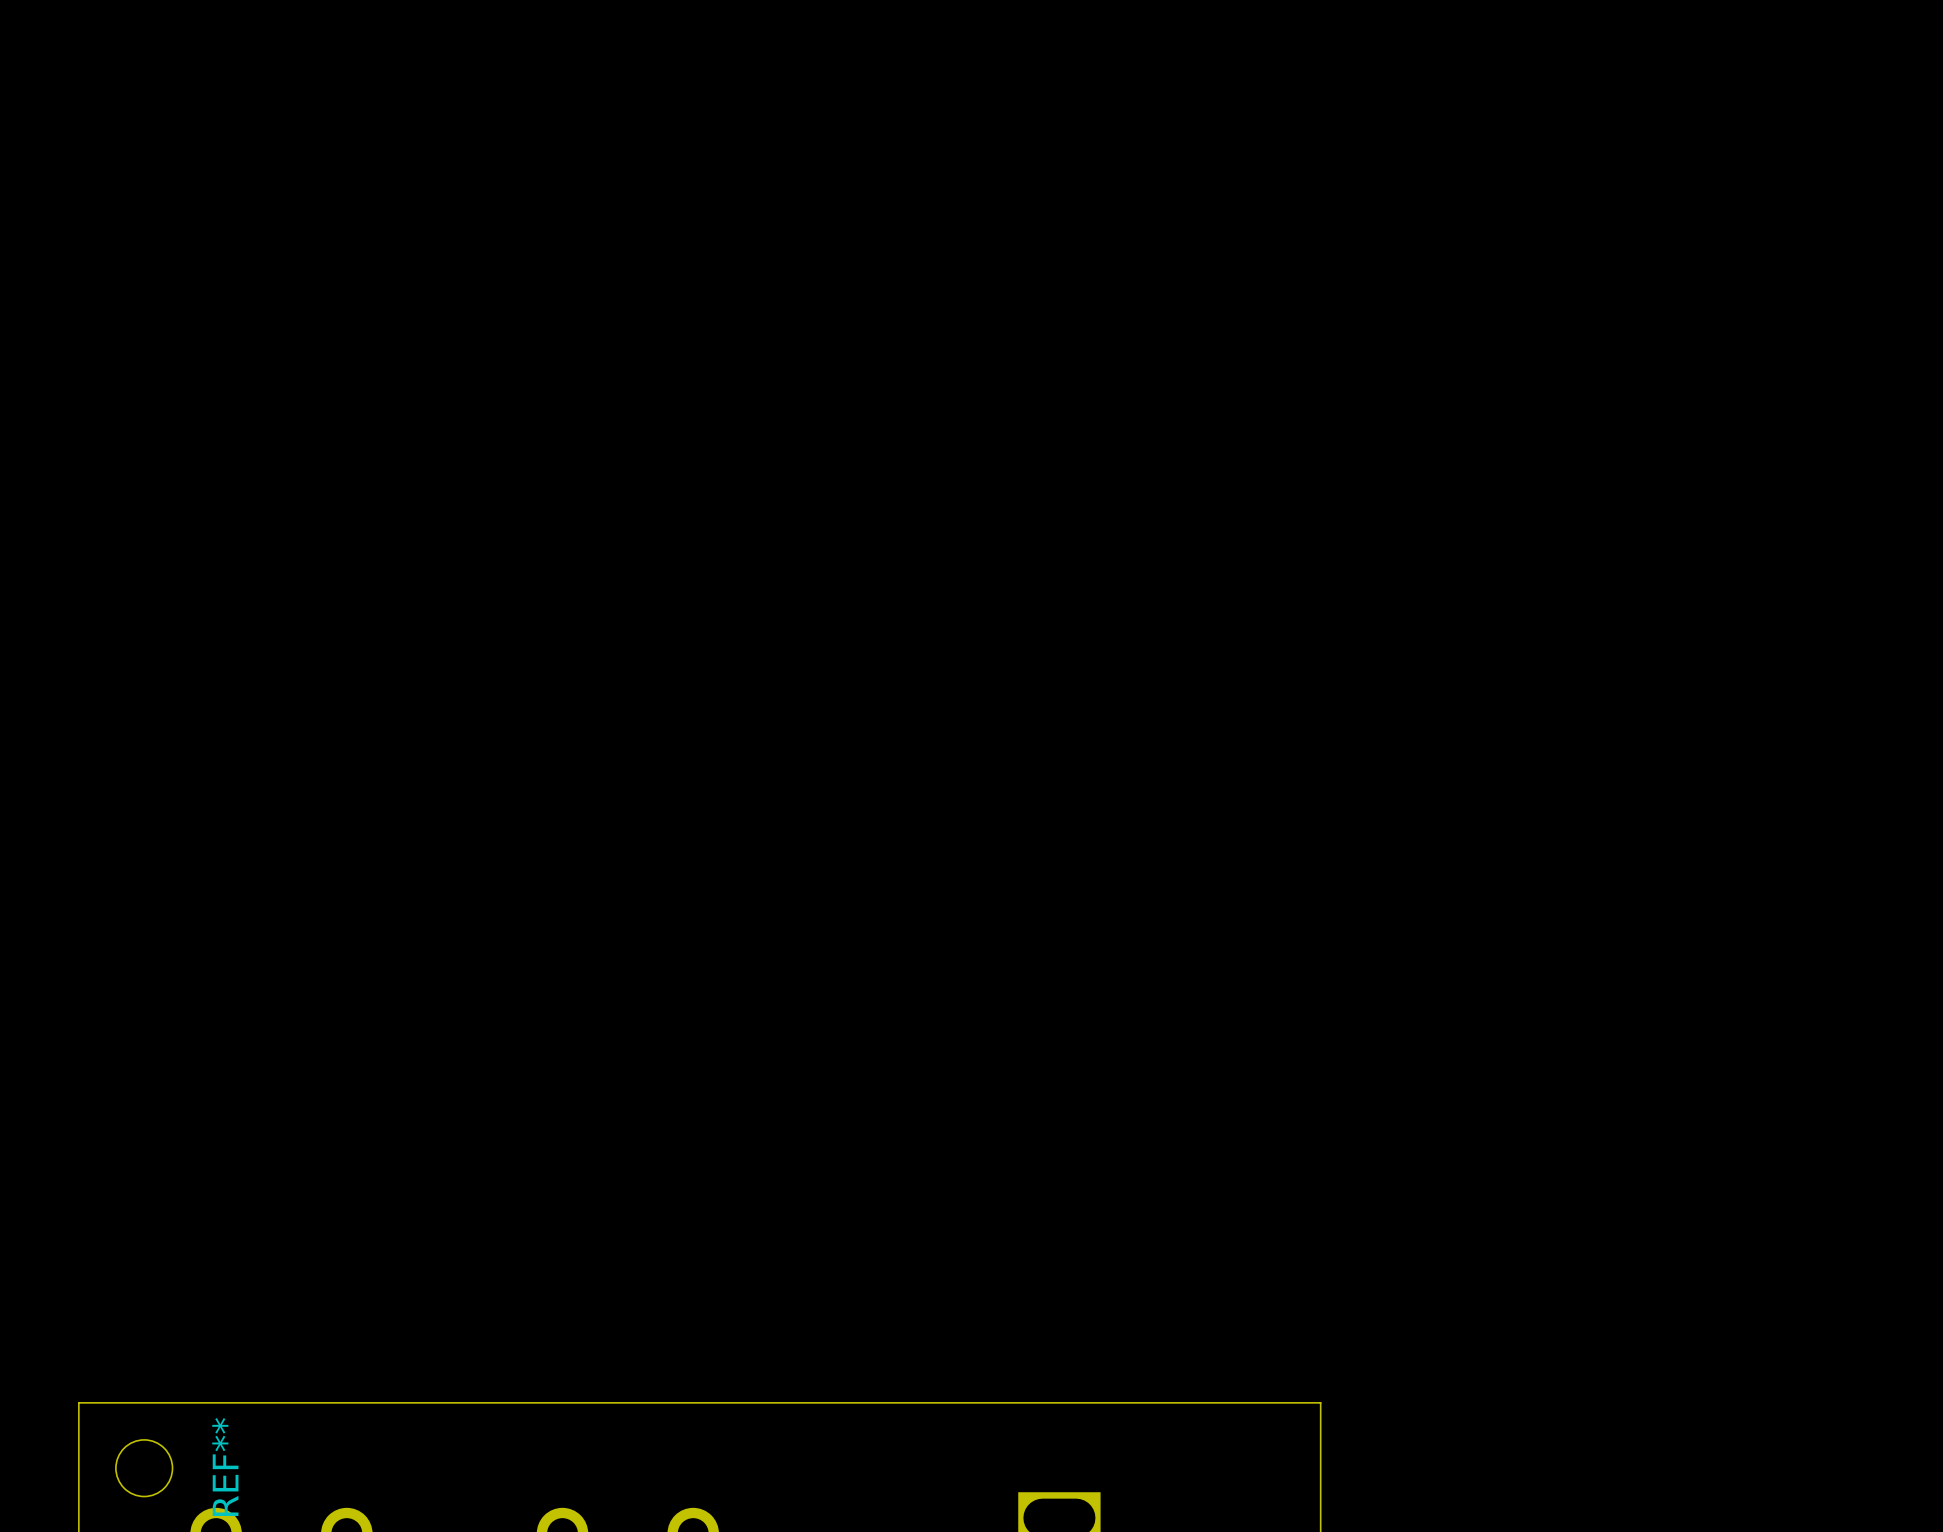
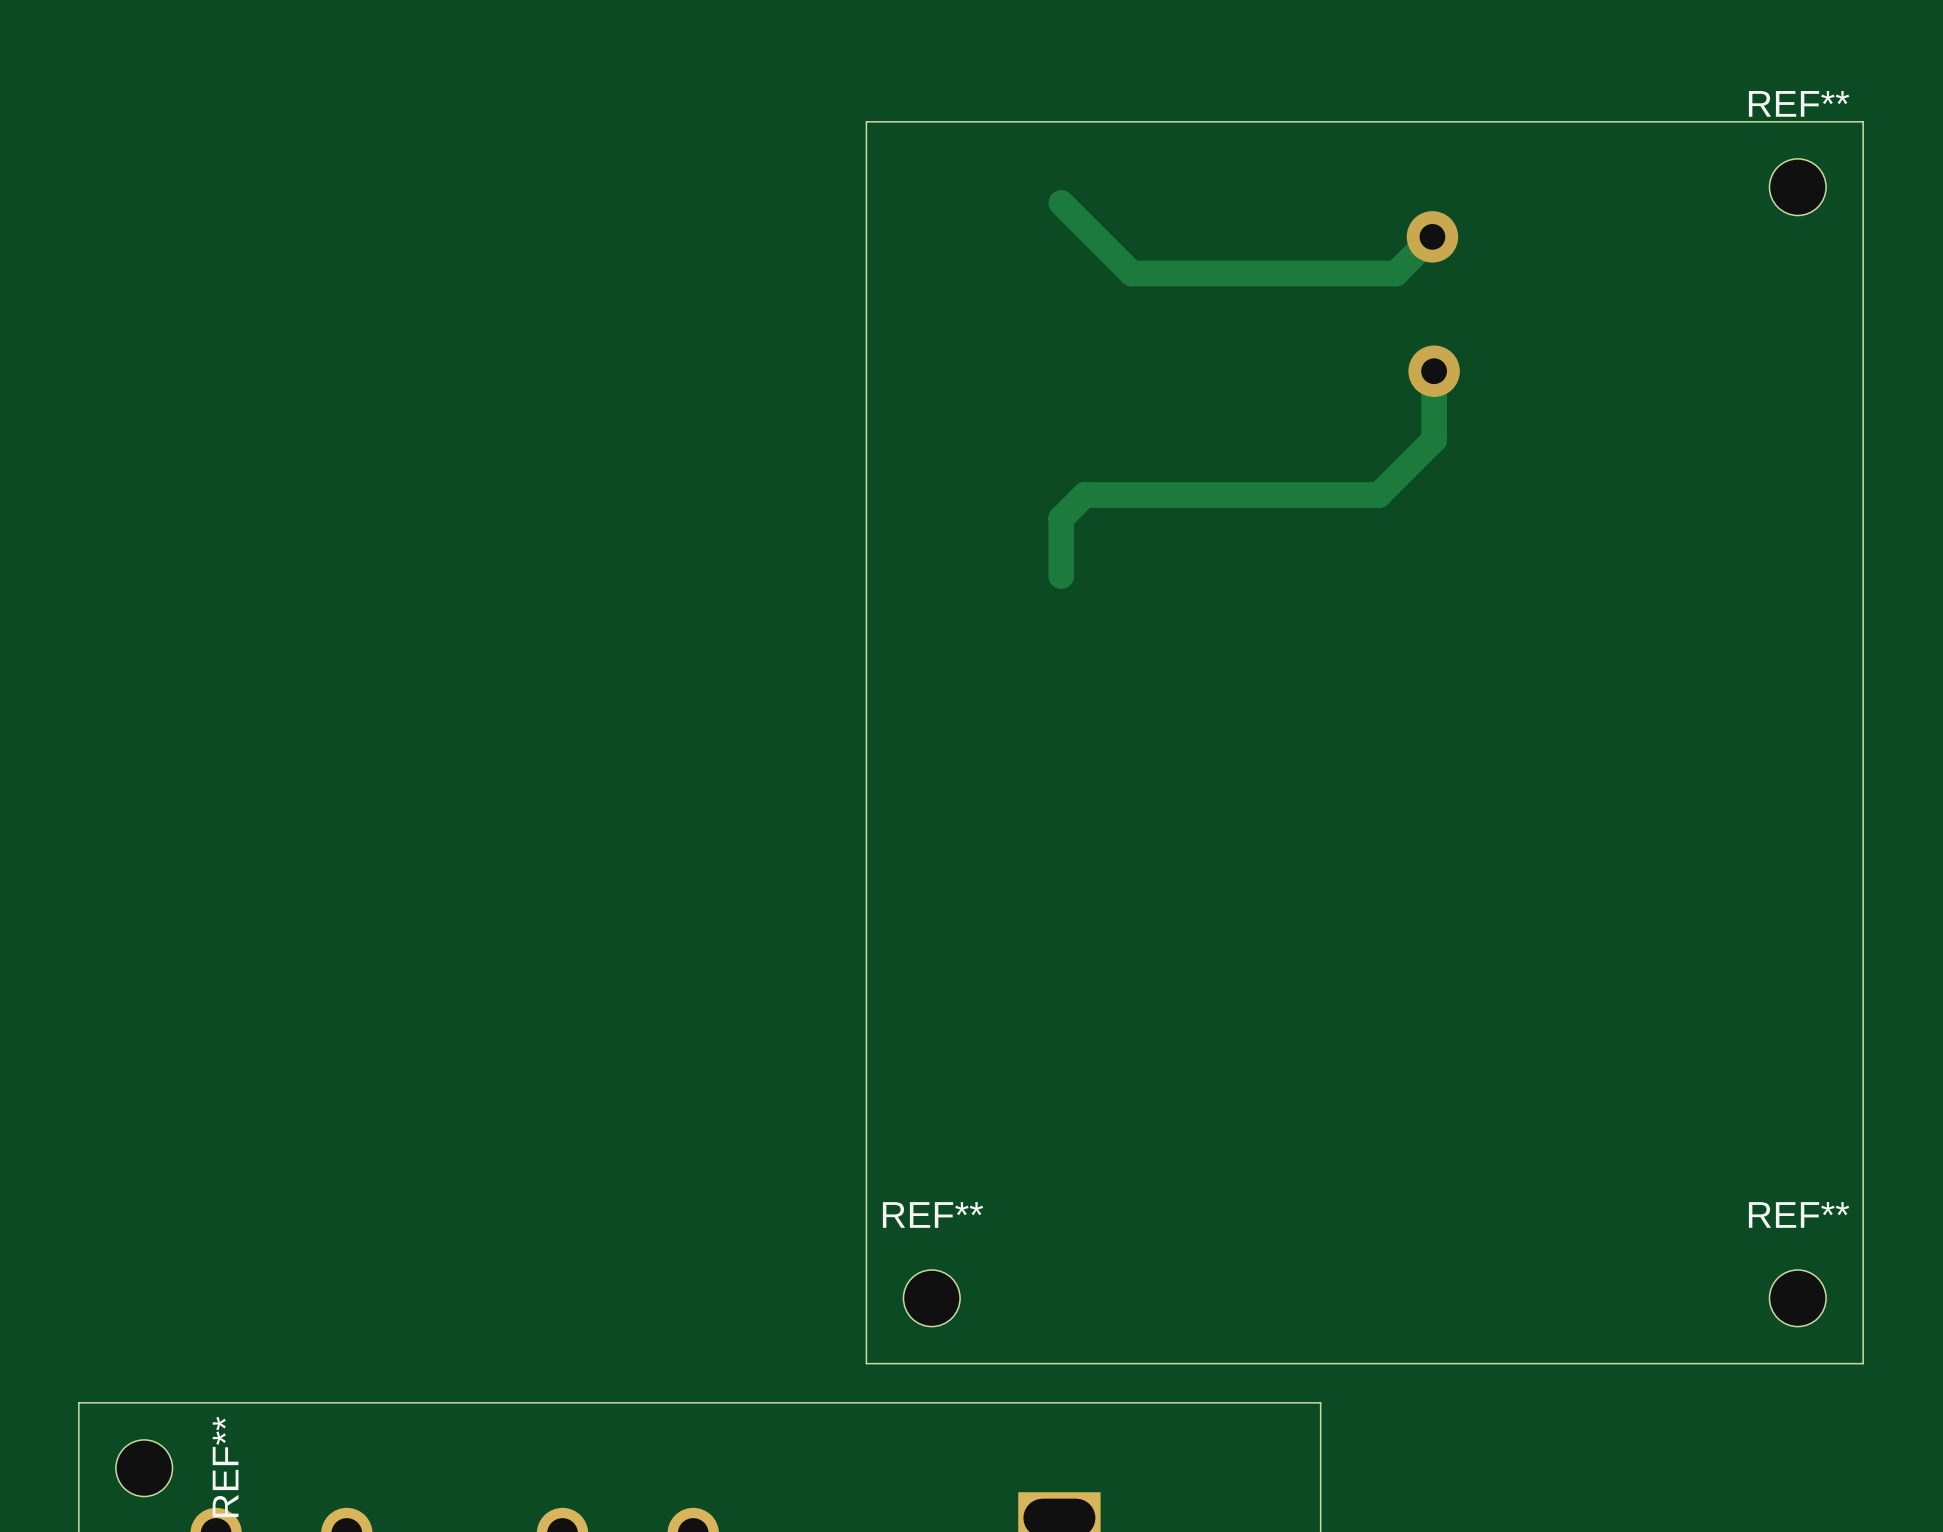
board edge: none -> (866, 121) (866, 1363) (1863, 1363) (1863, 121) (866, 121)
REF**: none -> (1797, 187)
track: none -> (1061, 202) (1131, 273) (1395, 273) (1432, 236)
via: none -> (1432, 236)
track: none -> (1434, 371) (1434, 439) (1378, 495) (1084, 495) (1061, 518) (1061, 576)
via: none -> (1434, 371)
REF**: none -> (931, 1298)
REF**: none -> (1797, 1298)

